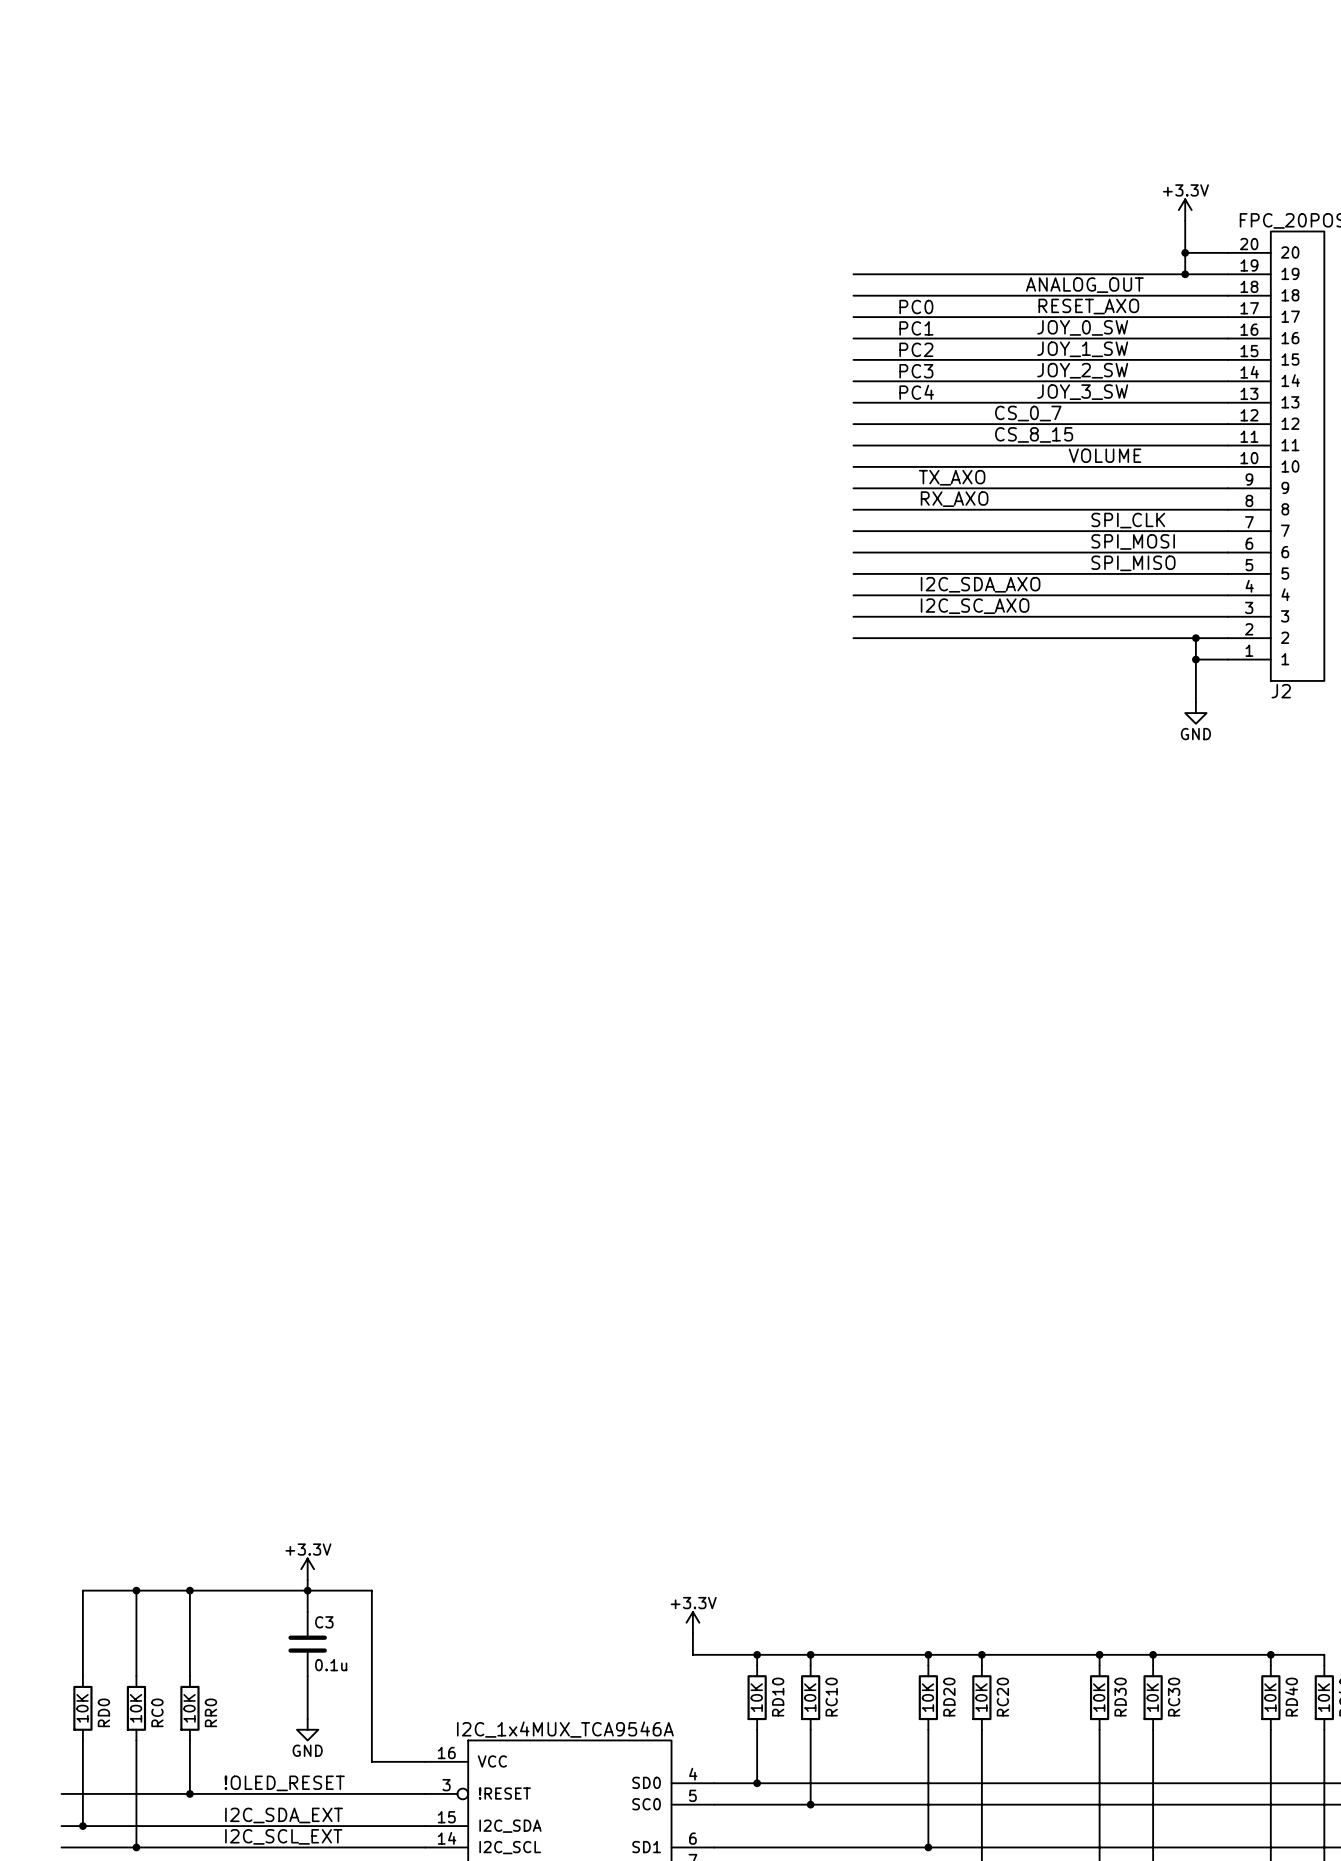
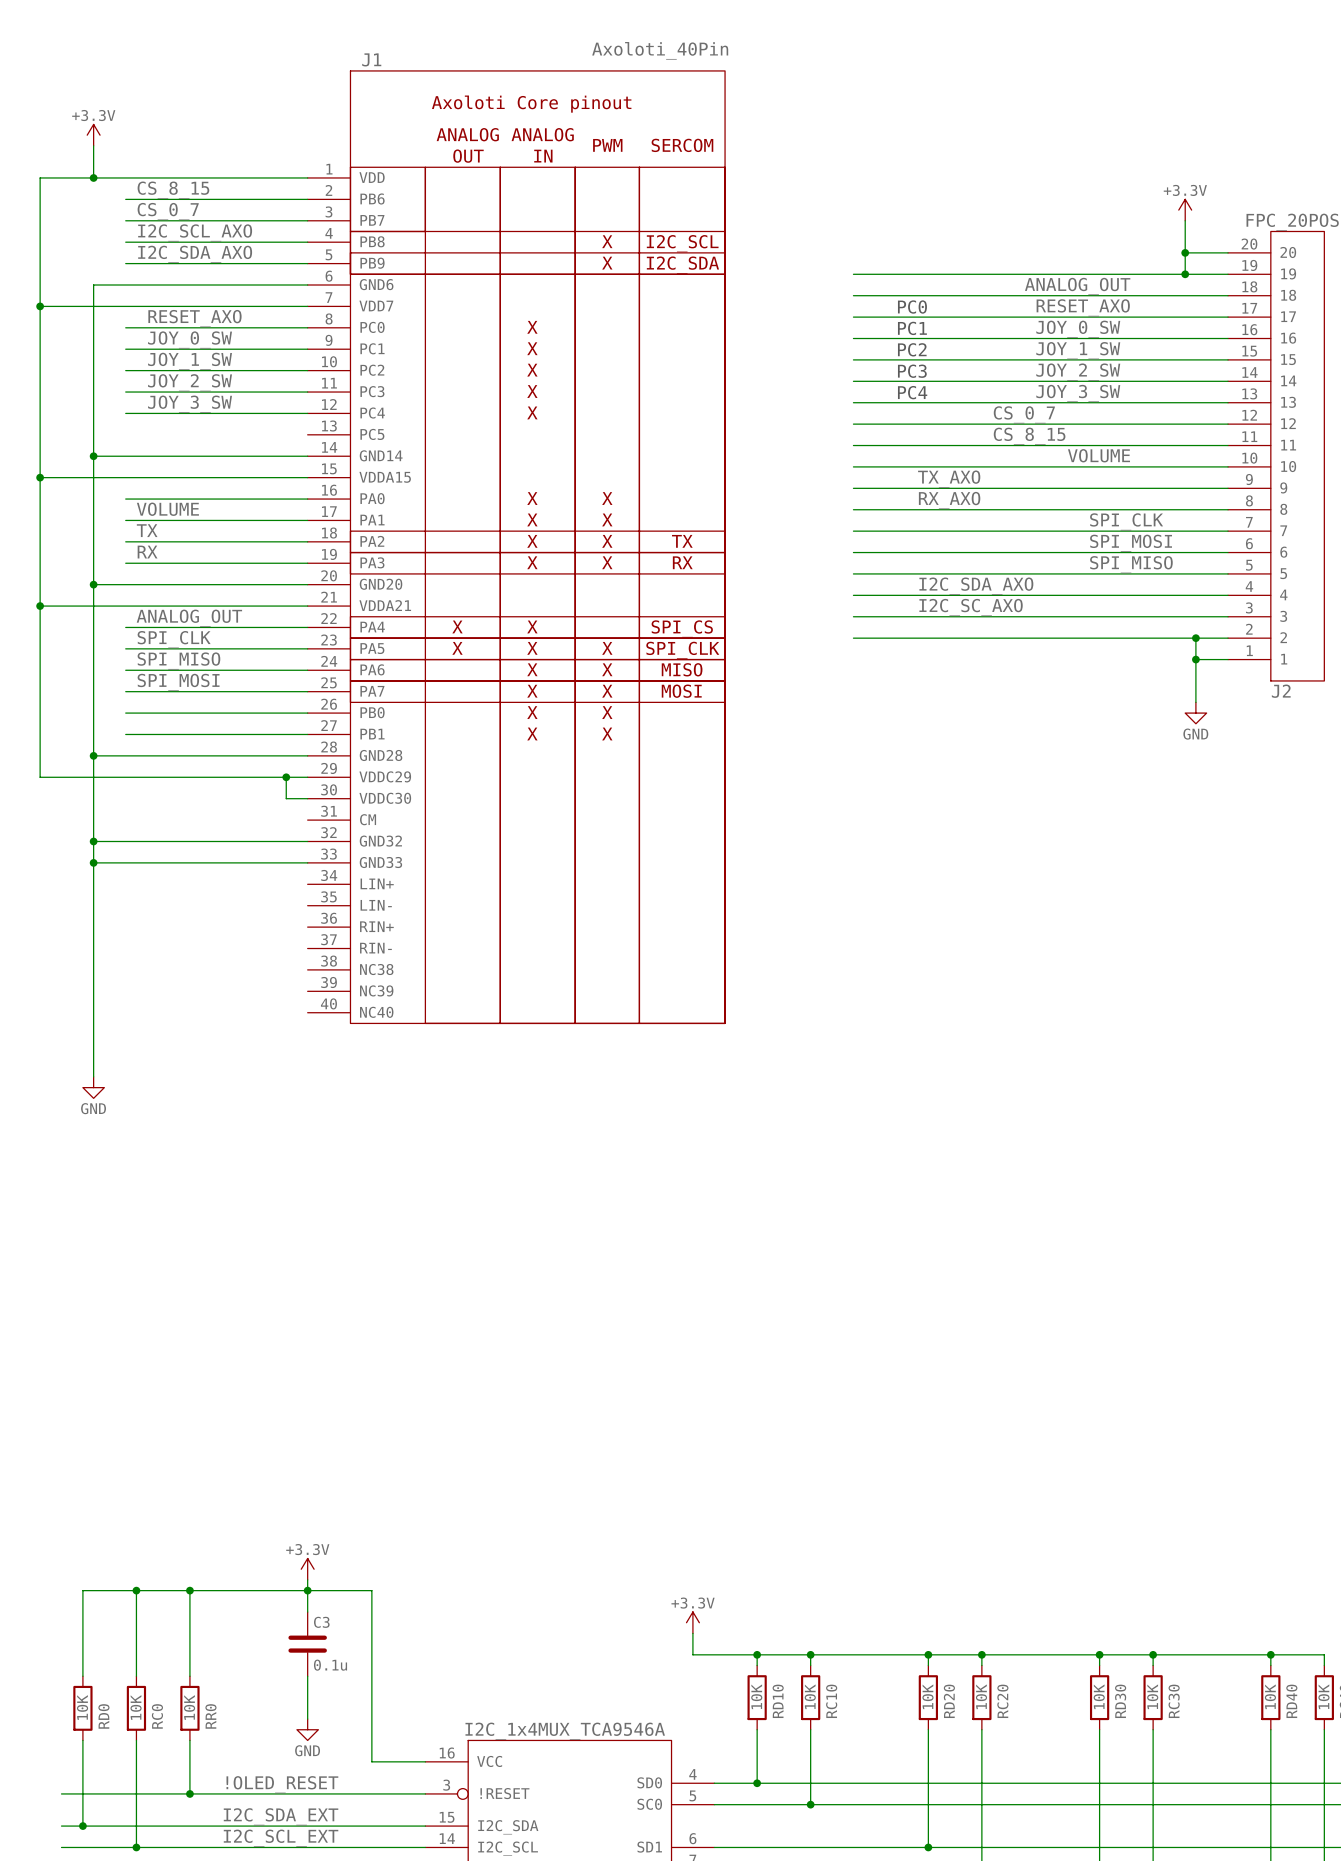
power symbol: none -> +3.3V (93, 135)
wire: none -> (93, 145) (93, 177)
junction: none -> (93, 177)
wire: none -> (307, 177) (40, 177) (40, 777) (307, 777)
label: none -> CS_8_15 (173, 190)
wire: none -> (125, 199) (307, 199)
label: none -> CS_0_7 (168, 211)
wire: none -> (125, 220) (307, 220)
label: none -> I2C_SCL_AXO (195, 232)
wire: none -> (125, 242) (307, 242)
label: none -> I2C_SDA_AXO (195, 254)
wire: none -> (125, 263) (307, 263)
wire: none -> (307, 285) (93, 285) (93, 1076)
wire: none -> (40, 306) (307, 306)
junction: none -> (40, 306)
label: none -> RESET_AXO (194, 318)
wire: none -> (125, 327) (307, 327)
label: none -> JOY_0_SW (190, 339)
wire: none -> (125, 349) (307, 349)
label: none -> JOY_1_SW (190, 361)
wire: none -> (125, 370) (307, 370)
label: none -> JOY_2_SW (190, 382)
wire: none -> (125, 392) (307, 392)
label: none -> JOY_3_SW (190, 404)
wire: none -> (125, 413) (307, 413)
wire: none -> (93, 456) (307, 456)
junction: none -> (93, 456)
wire: none -> (40, 477) (307, 477)
junction: none -> (40, 477)
wire: none -> (125, 499) (307, 499)
label: none -> VOLUME (167, 509)
wire: none -> (125, 520) (307, 520)
label: none -> TX (147, 530)
wire: none -> (125, 541) (307, 541)
J1: none -> Axoloti_40Pin (516, 547)
label: none -> RX (147, 552)
wire: none -> (125, 563) (307, 563)
wire: none -> (93, 584) (307, 584)
junction: none -> (93, 584)
wire: none -> (40, 606) (307, 606)
junction: none -> (40, 606)
label: none -> ANALOG_OUT (189, 618)
wire: none -> (125, 627) (307, 627)
label: none -> SPI_CLK (174, 639)
wire: none -> (125, 648) (307, 648)
label: none -> SPI_MISO (178, 661)
wire: none -> (125, 670) (307, 670)
label: none -> SPI_MOSI (178, 682)
wire: none -> (125, 691) (307, 691)
wire: none -> (125, 713) (307, 713)
wire: none -> (125, 734) (307, 734)
wire: none -> (93, 755) (307, 755)
junction: none -> (93, 755)
wire: none -> (286, 777) (286, 798) (307, 798)
junction: none -> (286, 777)
wire: none -> (93, 841) (307, 841)
junction: none -> (93, 841)
wire: none -> (93, 862) (307, 862)
junction: none -> (93, 862)
power symbol: none -> GND (93, 1087)

